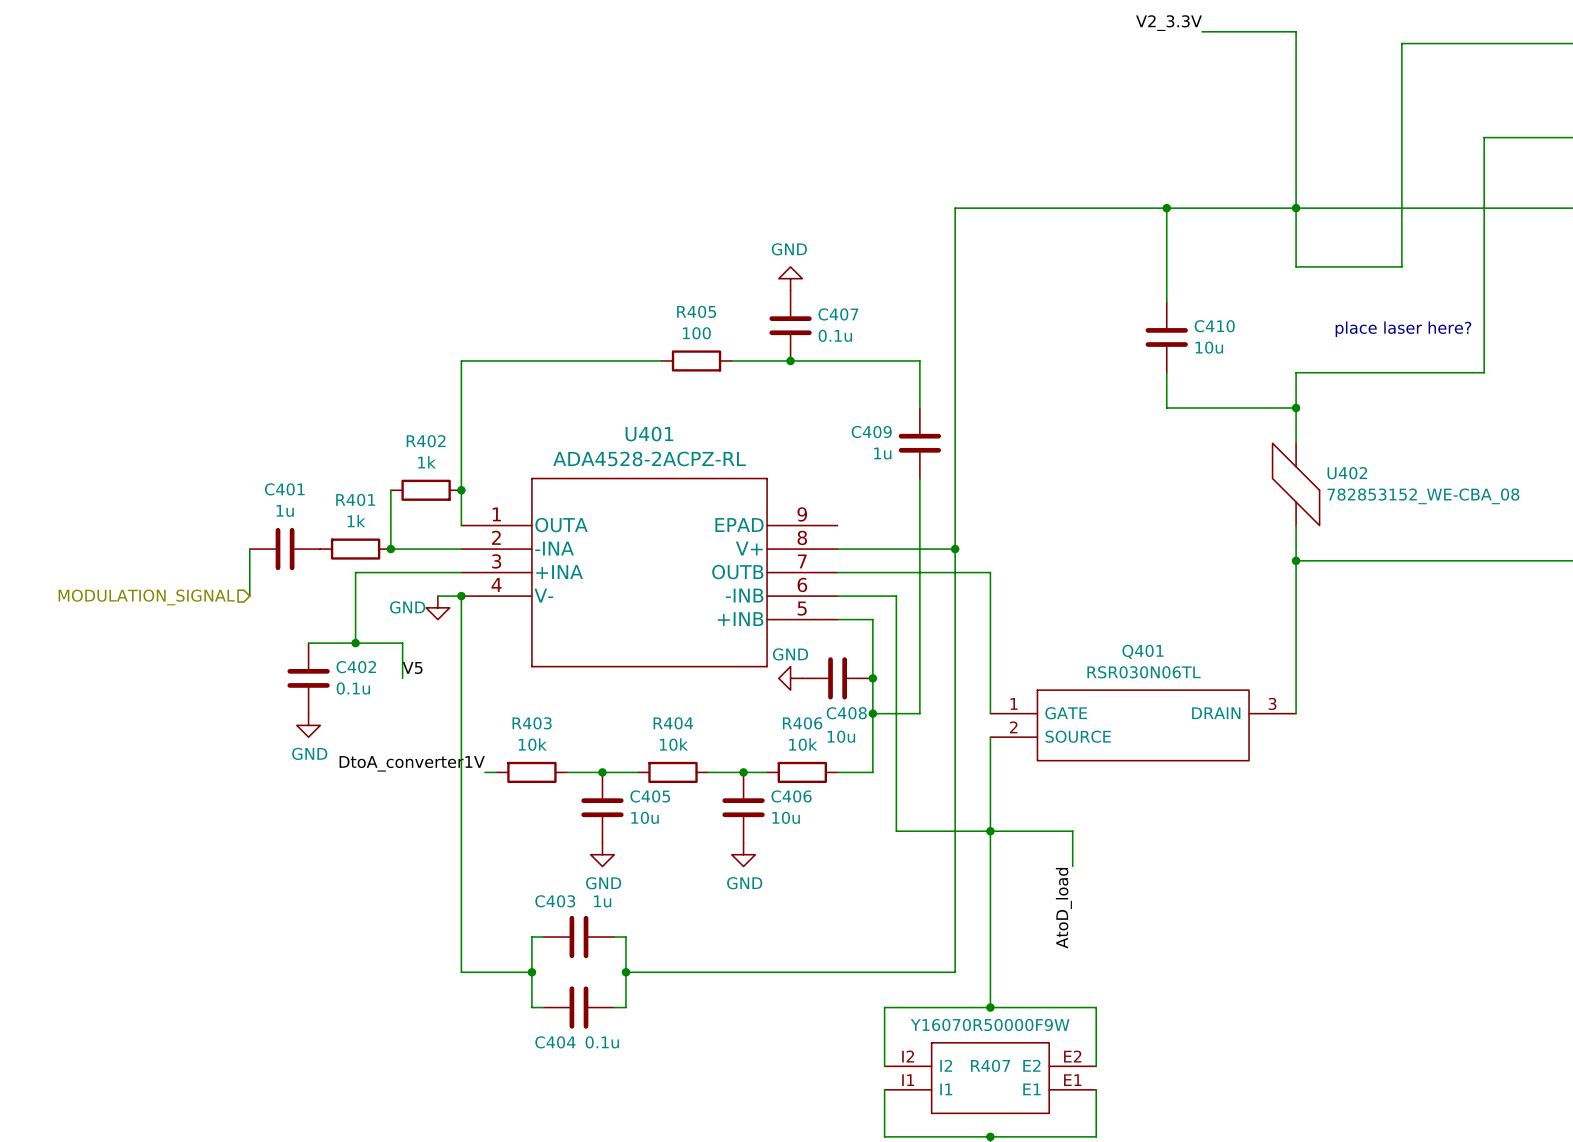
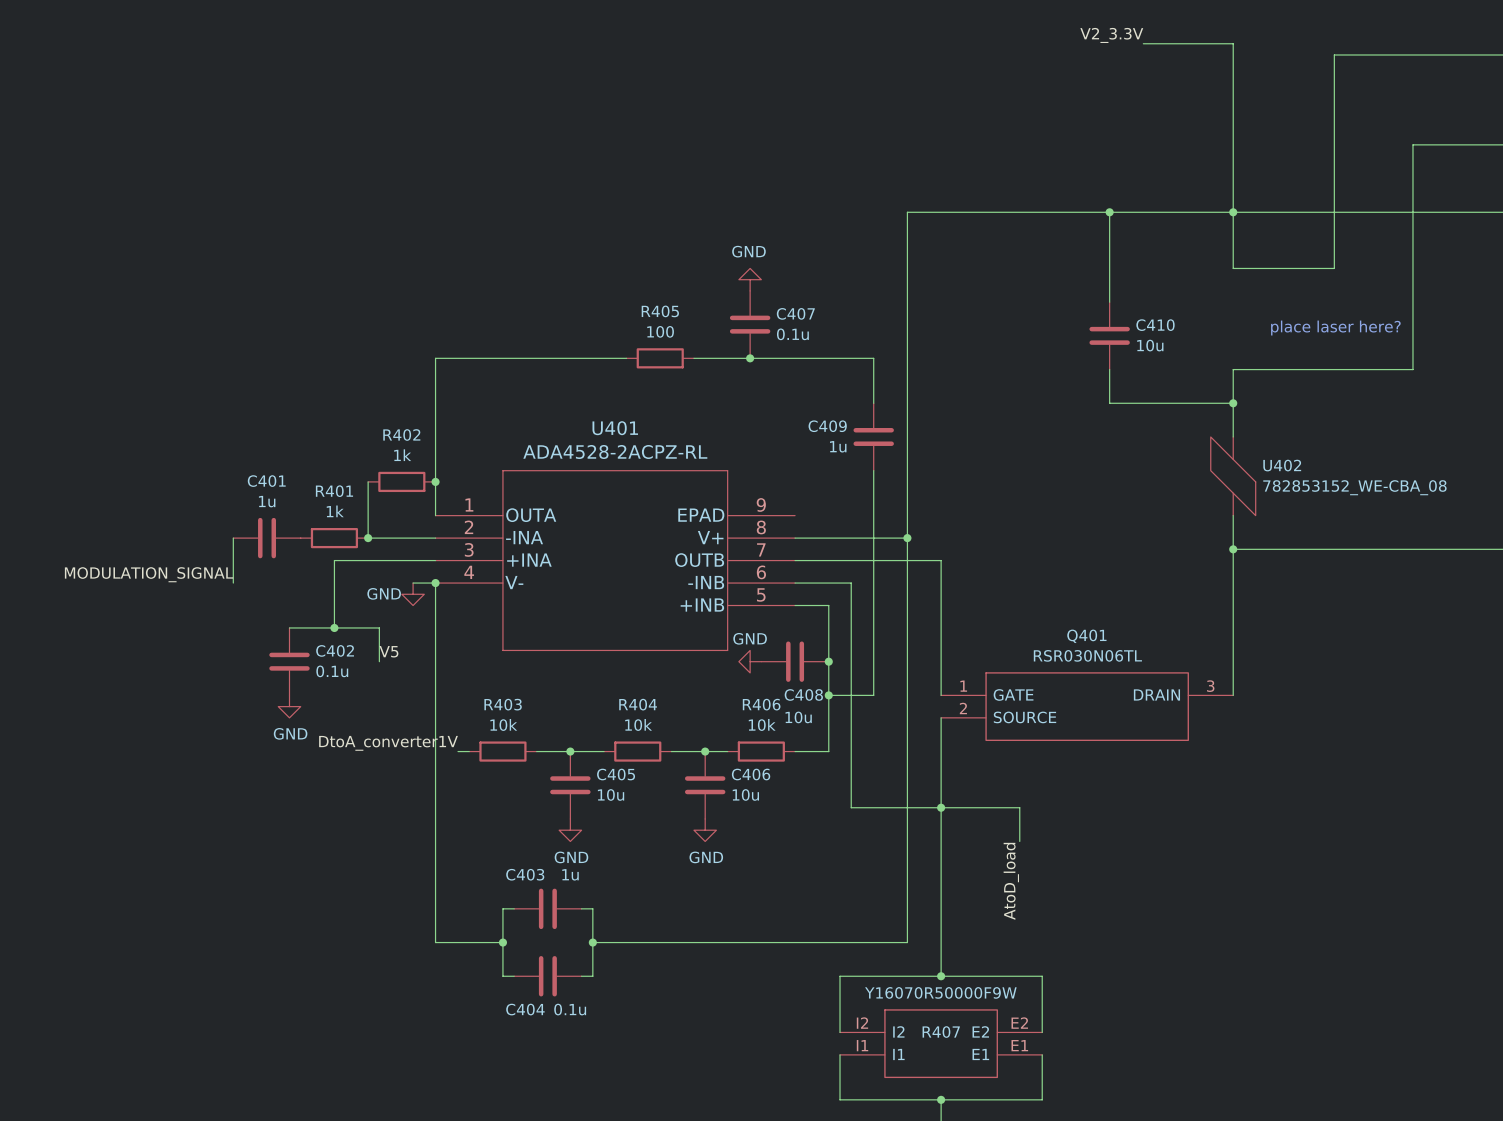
label: none -> MODULATION_SIGNAL (149, 574)
hierarchical label: MODULATION_SIGNAL (146, 597) -> none

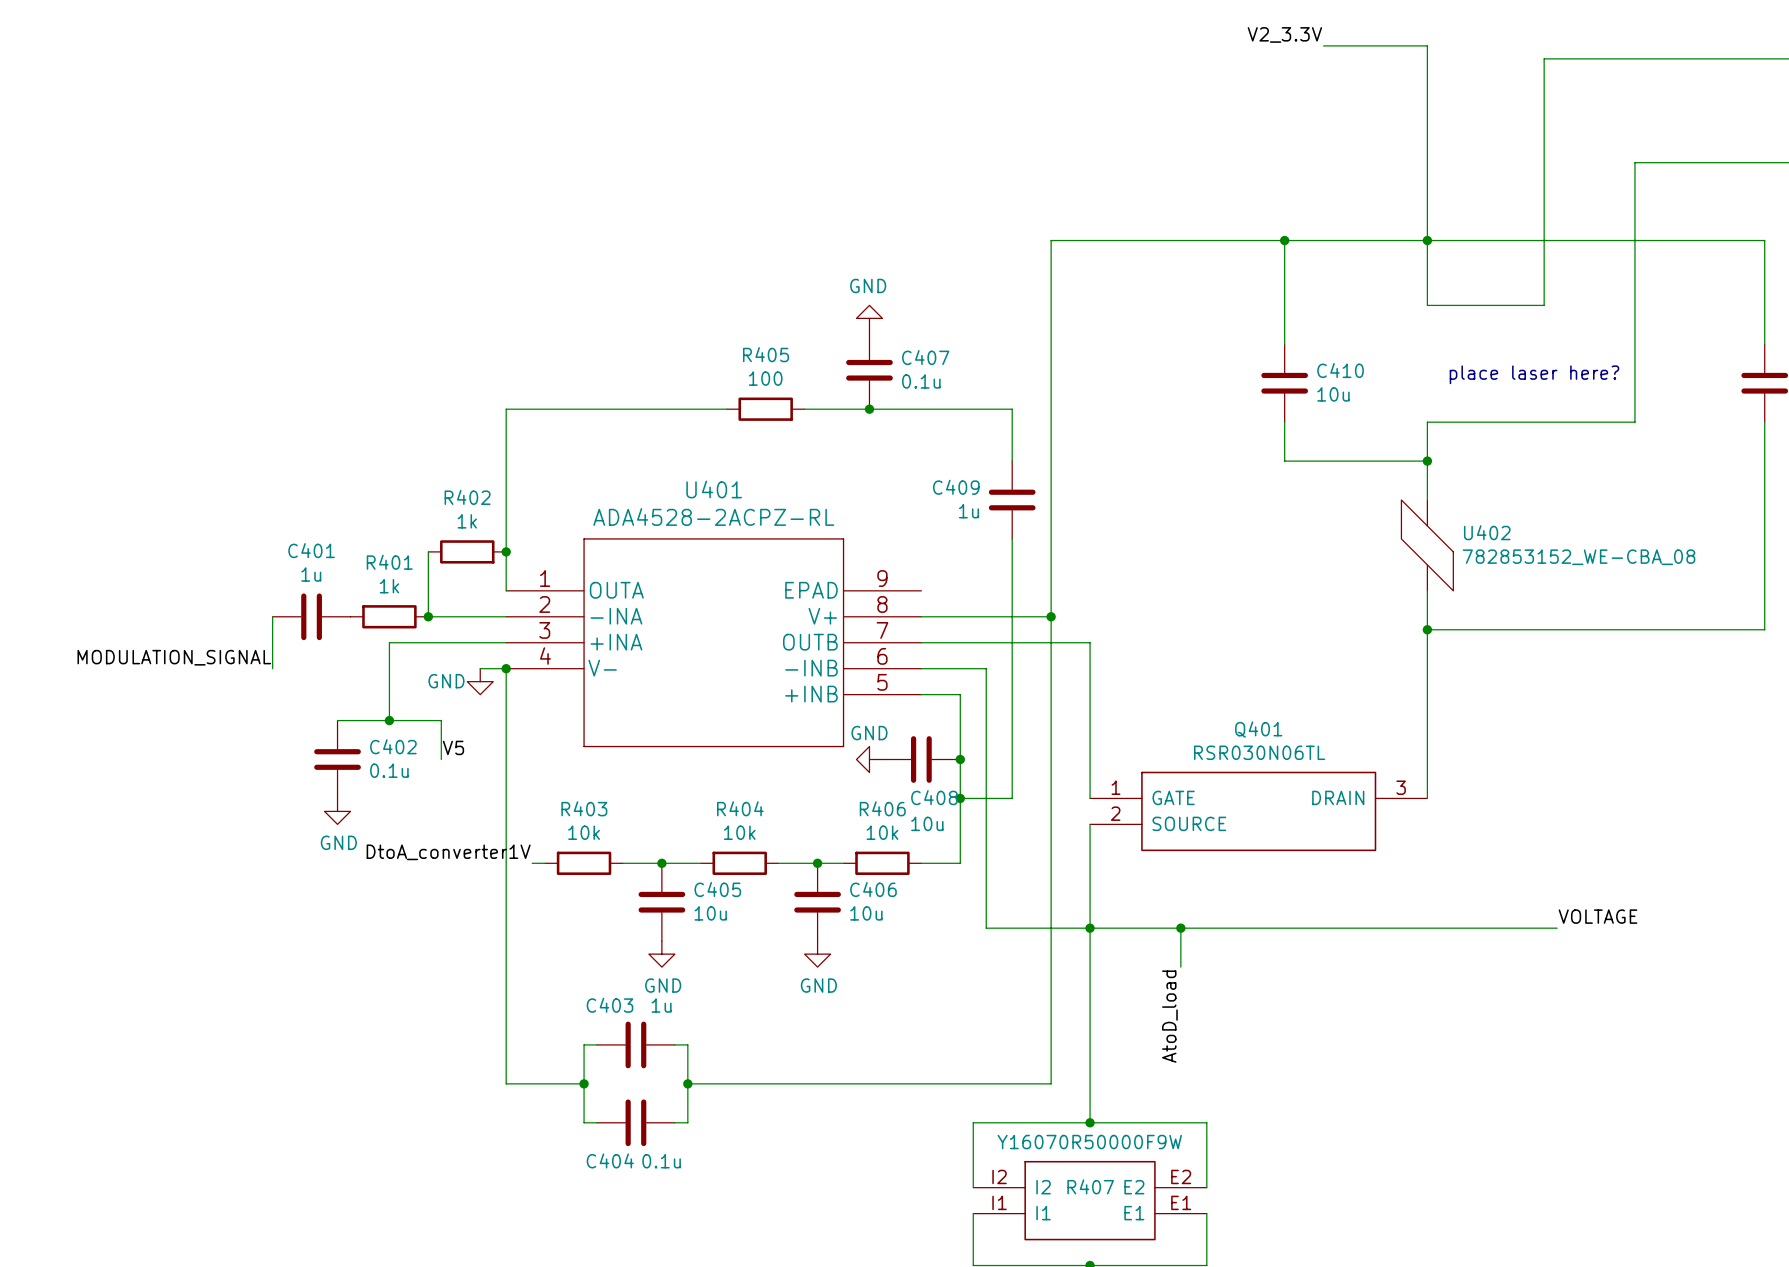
label: none -> VOLTAGE (1598, 916)
wire: none -> (1180, 928) (1557, 928)
junction: none -> (1180, 928)

